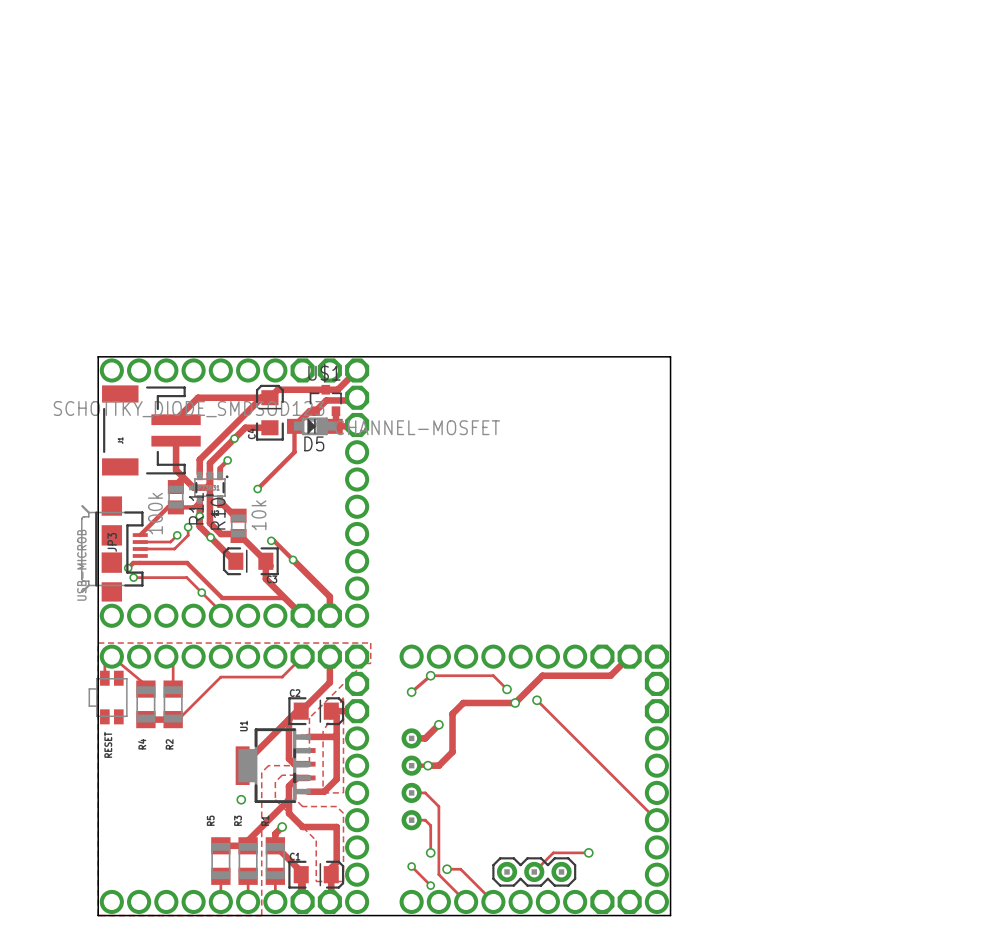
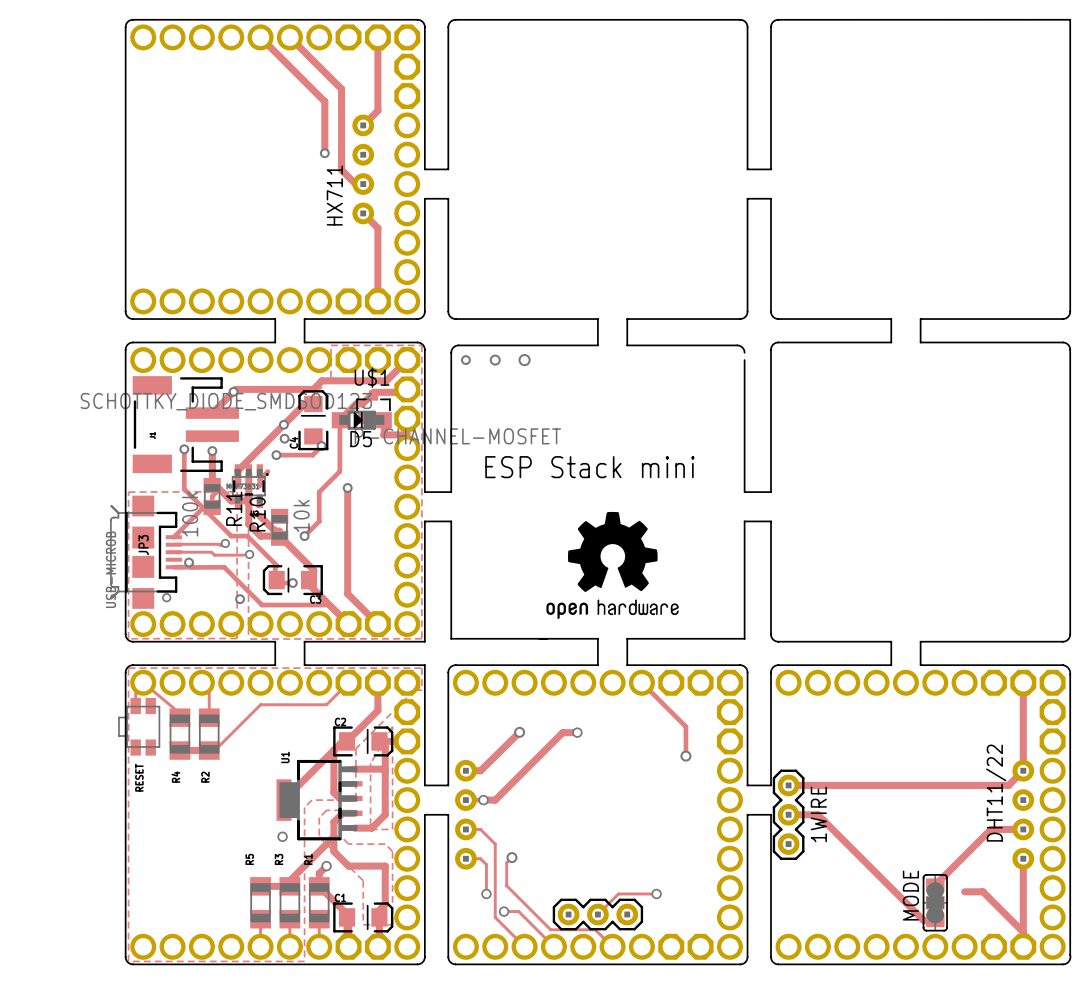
board edge: none -> (132, 19) (421, 20) (424, 27) (424, 169) (448, 169) (448, 27) (449, 22) (453, 20) (743, 20) (747, 27) (747, 169) (771, 169) (771, 27) (775, 20) (1070, 19) (1069, 315) (1062, 319) (920, 319) (920, 342) (1062, 342) (1067, 344) (1069, 347) (1069, 638) (1062, 641) (920, 641) (920, 665) (1062, 665) (1069, 670) (1070, 956) (1068, 962) (1062, 964) (775, 963) (771, 957) (771, 814) (747, 814) (747, 957) (743, 963) (453, 964) (449, 961) (448, 957) (448, 814) (424, 814) (424, 957) (421, 963) (132, 964) (127, 962) (125, 957) (126, 668) (132, 665) (275, 665) (275, 641) (132, 641) (128, 640) (125, 636) (126, 346) (132, 342) (275, 342) (275, 319) (132, 319) (126, 314) (125, 27) (127, 21) (132, 19)
track: none -> (260, 37) (324, 101) (324, 153)
track: none -> (289, 37) (341, 89) (341, 169) (355, 184) (363, 184)
track: none -> (377, 37) (377, 110) (363, 125)
via: none -> (324, 153)
part: none -> (275, 169)
HX711: none -> (363, 169)
board edge: none -> (424, 198) (448, 198) (448, 311) (451, 317) (597, 319) (597, 345) (458, 345) (452, 348) (451, 492) (424, 492) (424, 349) (422, 344) (417, 342) (304, 342) (304, 319) (417, 319) (423, 316) (424, 198)
track: none -> (363, 213) (377, 228) (377, 301)
zone outline: none -> (330, 345) (330, 377) (248, 463) (248, 639) (421, 638) (421, 345) (330, 345)
board edge: none -> (744, 352) (742, 347) (737, 345) (627, 345) (627, 319) (744, 317) (747, 311) (747, 198) (771, 198) (772, 316) (778, 319) (891, 319) (891, 342) (778, 342) (773, 344) (771, 349) (771, 492) (744, 492)
via: none -> (465, 360)
via: none -> (495, 360)
via: none -> (524, 360)
board edge: (670, 356) (98, 356) (98, 915) (670, 915) (670, 615) -> none
track: (357, 370) (337, 389) (277, 389) (269, 397) (198, 397) (176, 419) -> (407, 360) (386, 380) (321, 380) (313, 389) (236, 389) (212, 413)
via: none -> (233, 391)
track: (357, 397) (354, 400) (326, 400) (315, 411) (309, 411) (294, 426) -> (407, 389) (404, 392) (374, 392) (362, 403) (356, 403) (339, 420) (339, 434)
via: none -> (283, 424)
D5 position: (314, 426) -> (361, 420)
track: (269, 427) (245, 427) (209, 463) -> none
via: none -> (284, 438)
part position: (151, 430) -> (185, 424)
track: none -> (321, 446) (312, 455) (276, 455)
via: none -> (321, 446)
via: (234, 438) -> none
track: none -> (184, 449) (184, 489) (203, 507)
via: none -> (184, 449)
via: none -> (212, 451)
via: none -> (276, 455)
track: (294, 452) (257, 489) -> (339, 462) (339, 471) (319, 492) (319, 521) (304, 536)
text: none -> ESP Stack mini (589, 467)
via: (227, 460) -> none
track: none -> (348, 487) (347, 593) (377, 624)
via: none -> (347, 487)
zone outline: none -> (237, 491) (128, 492) (128, 638) (237, 638) (237, 491)
board edge: (670, 479) (670, 506) -> (744, 638) (627, 638) (627, 665) (740, 665) (745, 667) (747, 672) (747, 785) (771, 785) (771, 672) (773, 666) (891, 665) (891, 641) (778, 641) (773, 639) (771, 634) (771, 521) (744, 521)
part position: (211, 487) -> (250, 486)
via: (257, 489) -> none
part position: (234, 493) -> (275, 492)
R11 position: (175, 497) -> (212, 496)
drawing: none -> [546, 511, 679, 619]
board edge: none -> (424, 521) (424, 641) (304, 641) (304, 665) (424, 665) (424, 785) (448, 785) (448, 672) (450, 667) (455, 665) (597, 665) (597, 638) (451, 638) (451, 521) (424, 521)
track: (209, 509) (209, 523) (220, 534) (236, 534) (240, 536) (270, 566) -> (248, 524) (260, 536) (277, 536) (281, 538) (314, 570)
via: (199, 516) -> none
via: none -> (304, 536)
track: none -> (173, 537) (203, 507) (231, 536) (247, 536) (276, 565) (275, 580) (280, 583) (292, 583)
R10 position: (238, 525) -> (279, 527)
track: (188, 527) (188, 535) (174, 549) (140, 549) -> (329, 605) (262, 605) (224, 567) (192, 567) (191, 566) (189, 562) (191, 567) (173, 567)
track: none -> (174, 544) (221, 545)
track: (140, 535) (167, 507) (193, 507) (199, 501) (199, 526) (234, 561) -> (173, 552) (211, 552) (214, 555) (244, 555)
track: (177, 535) (170, 542) (140, 542) -> none
via: (177, 535) -> none
track: (271, 540) (274, 540) (329, 596) (329, 615) -> none
via: (271, 540) -> none
via: none -> (189, 562)
JP3 position: (114, 549) -> (146, 552)
via: (293, 559) -> none
via: none -> (292, 583)
track: (265, 565) (265, 579) (302, 615) -> (309, 584) (348, 624)
track: (128, 568) (133, 562) (187, 562) (222, 598) (284, 598) -> none
via: (128, 568) -> none
track: (133, 577) (186, 577) (220, 611) (220, 615) -> none
via: none -> (240, 599)
via: (201, 592) -> none
track: none -> (641, 682) (685, 726) (685, 756)
track: (629, 656) (610, 675) (542, 675) (515, 702) -> none
track: none -> (1023, 682) (1023, 770) (1008, 785) (788, 785)
via: (430, 675) -> none
track: (507, 689) (493, 675) (430, 675) (411, 692) -> none
via: (507, 689) -> none
via: (411, 692) -> none
track: (537, 700) (656, 820) -> none
via: (537, 700) -> none
via: none -> (519, 732)
track: (501, 702) (463, 702) (452, 713) (452, 752) -> (562, 732) (509, 785)
track: (438, 724) (425, 738) -> (519, 732) (480, 770)
via: (438, 724) -> none
via: none -> (685, 756)
track: none -> (788, 814) (817, 814) (923, 920) (935, 920)
1WIRE: none -> (788, 814)
part: none -> (920, 814)
DHT11/22: none -> (1023, 814)
track: none -> (1023, 829) (991, 829) (935, 885)
track: none -> (511, 857) (506, 862) (506, 885) (550, 929) (595, 929) (612, 946)
via: none -> (511, 857)
track: none -> (1023, 858) (1023, 946)
track: none -> (964, 891) (982, 891) (1023, 932)
MODE: none -> (935, 902)
track: (411, 866) (430, 885) -> none
via: (411, 866) -> none
via: (430, 885) -> none

